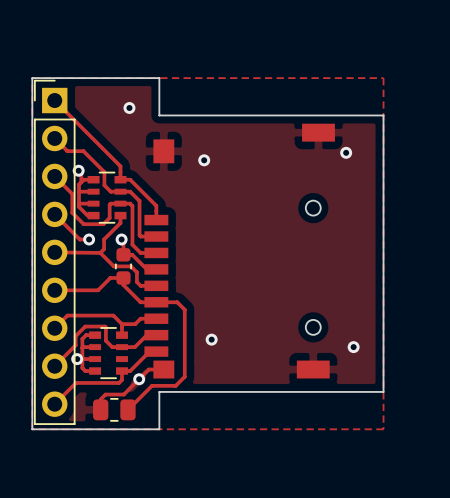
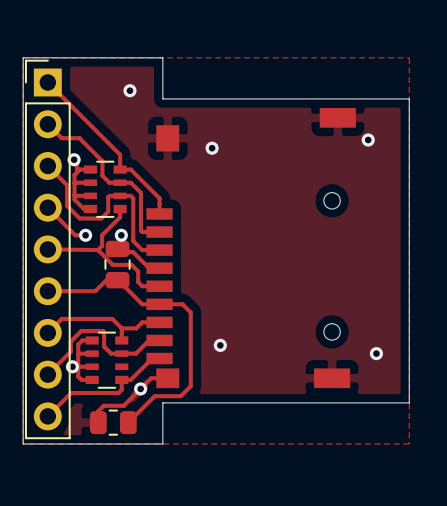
part footprint: [114, 248, 133, 285] -> [104, 240, 131, 289]

